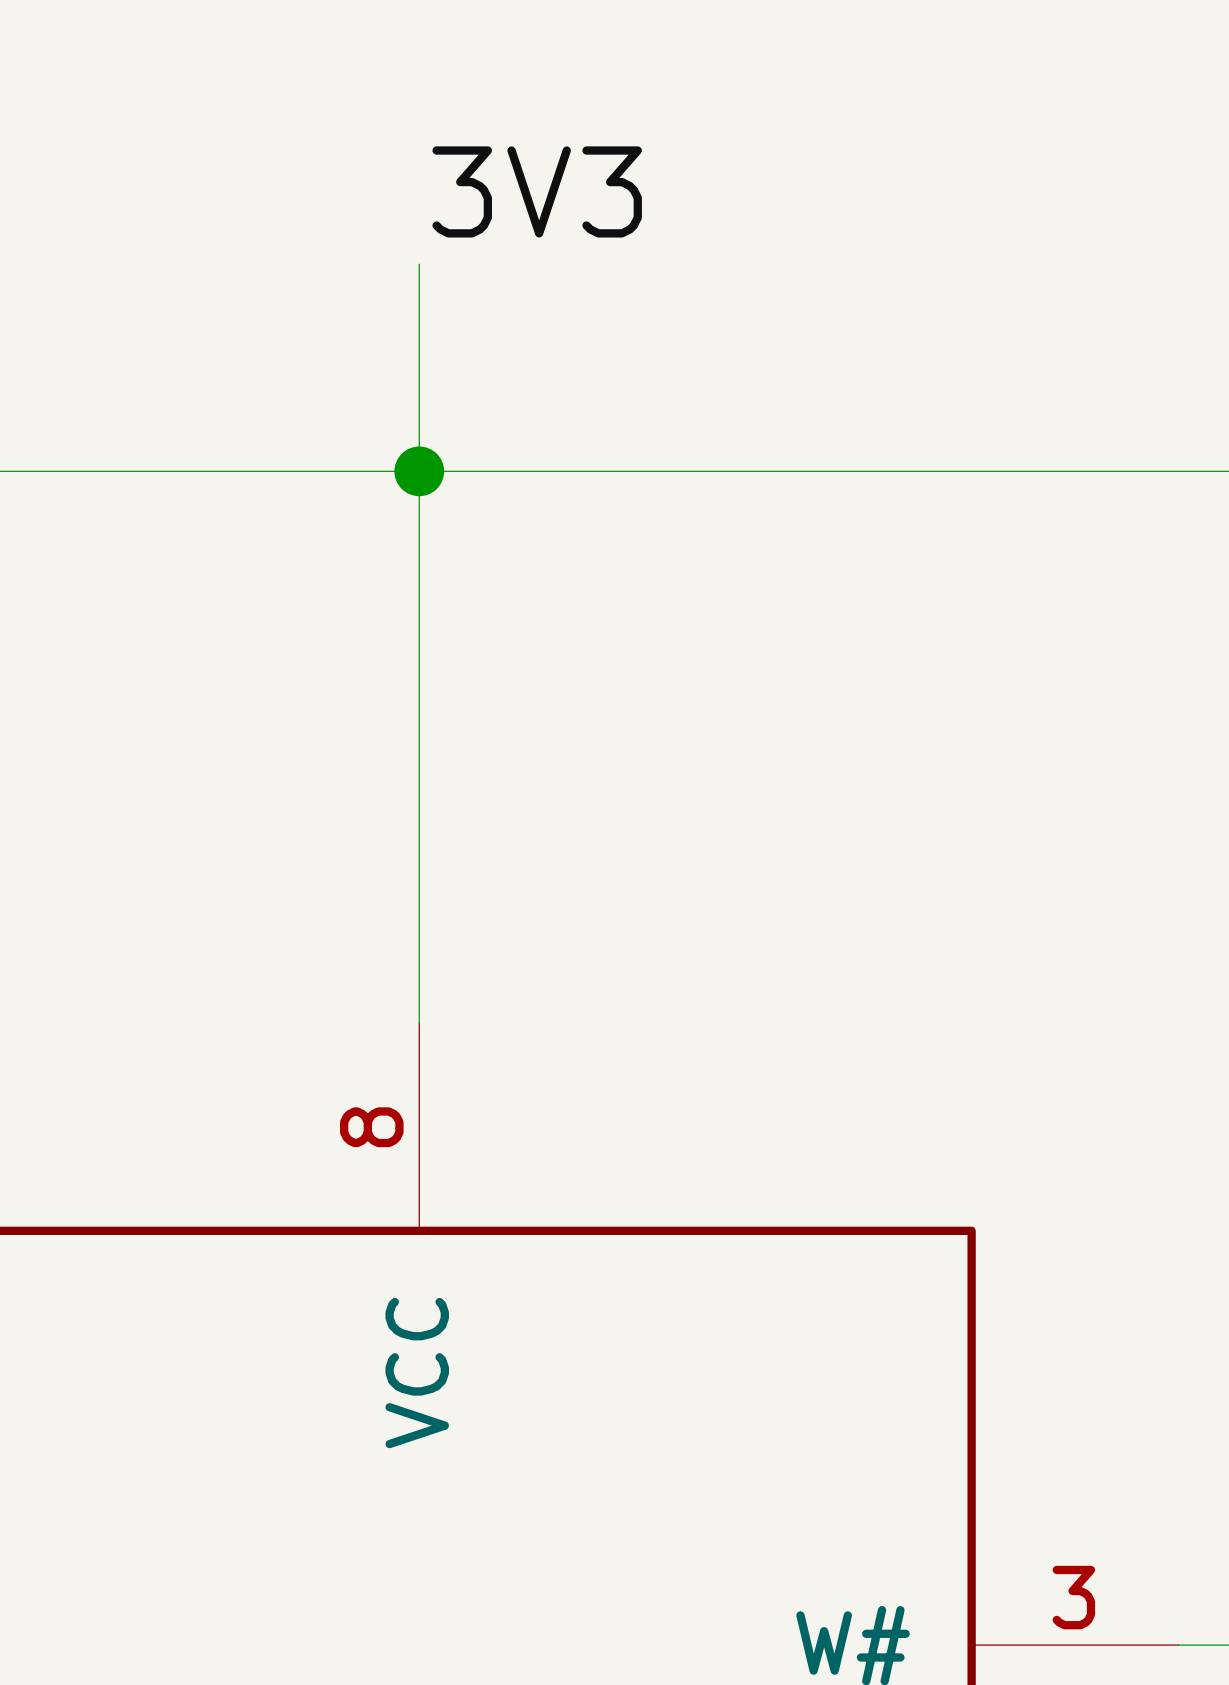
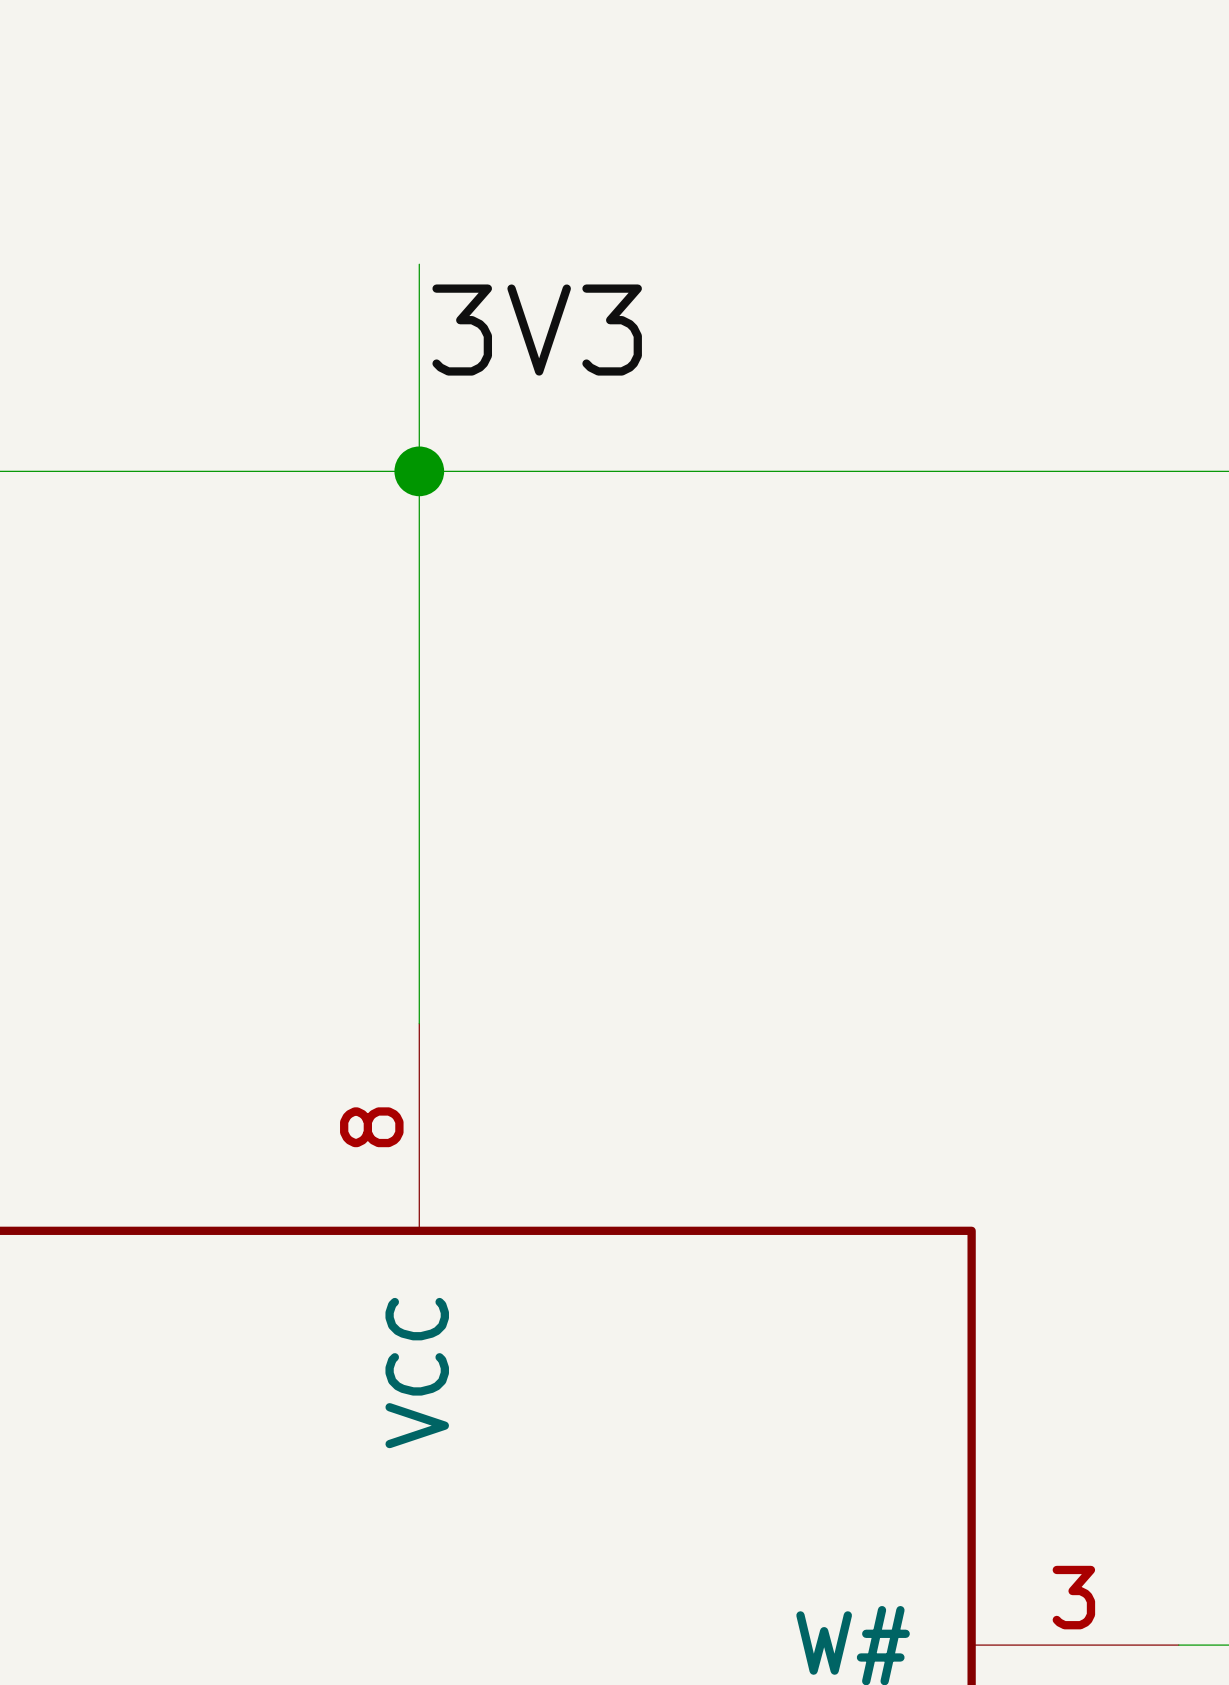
label position: 3V3 (537, 191) -> 3V3 (537, 330)

